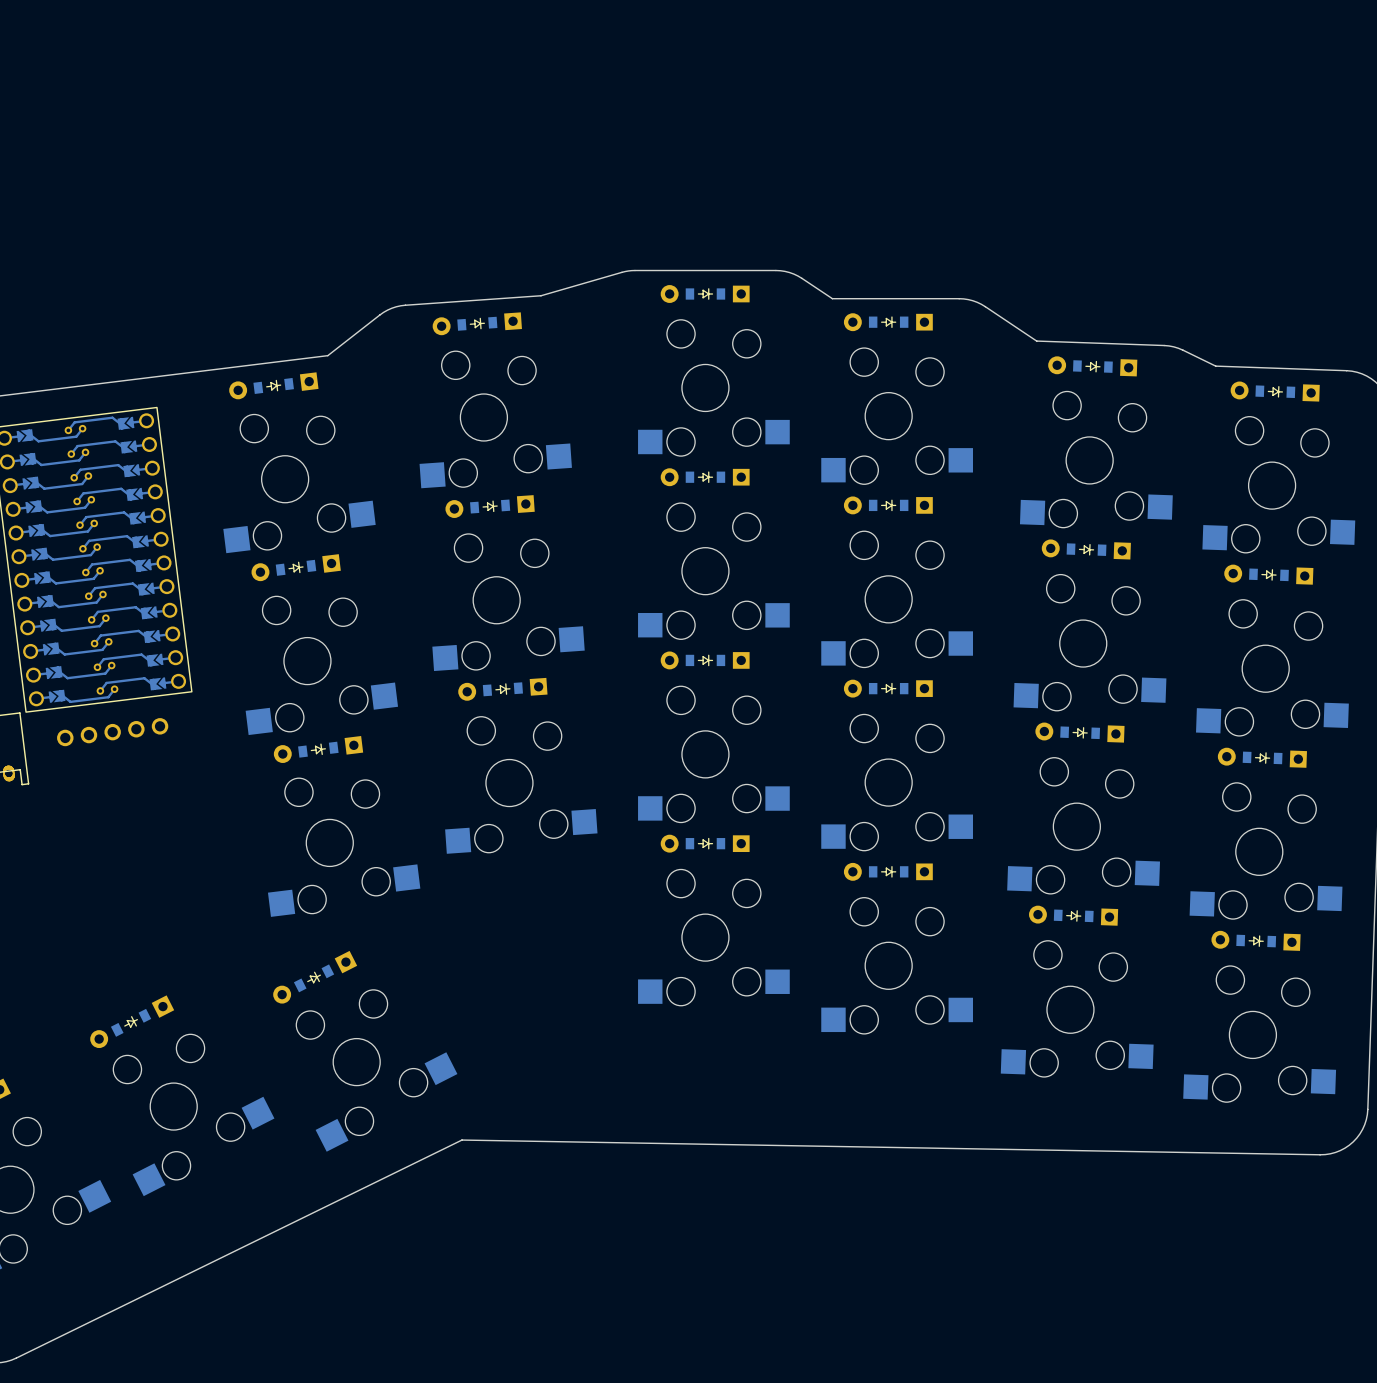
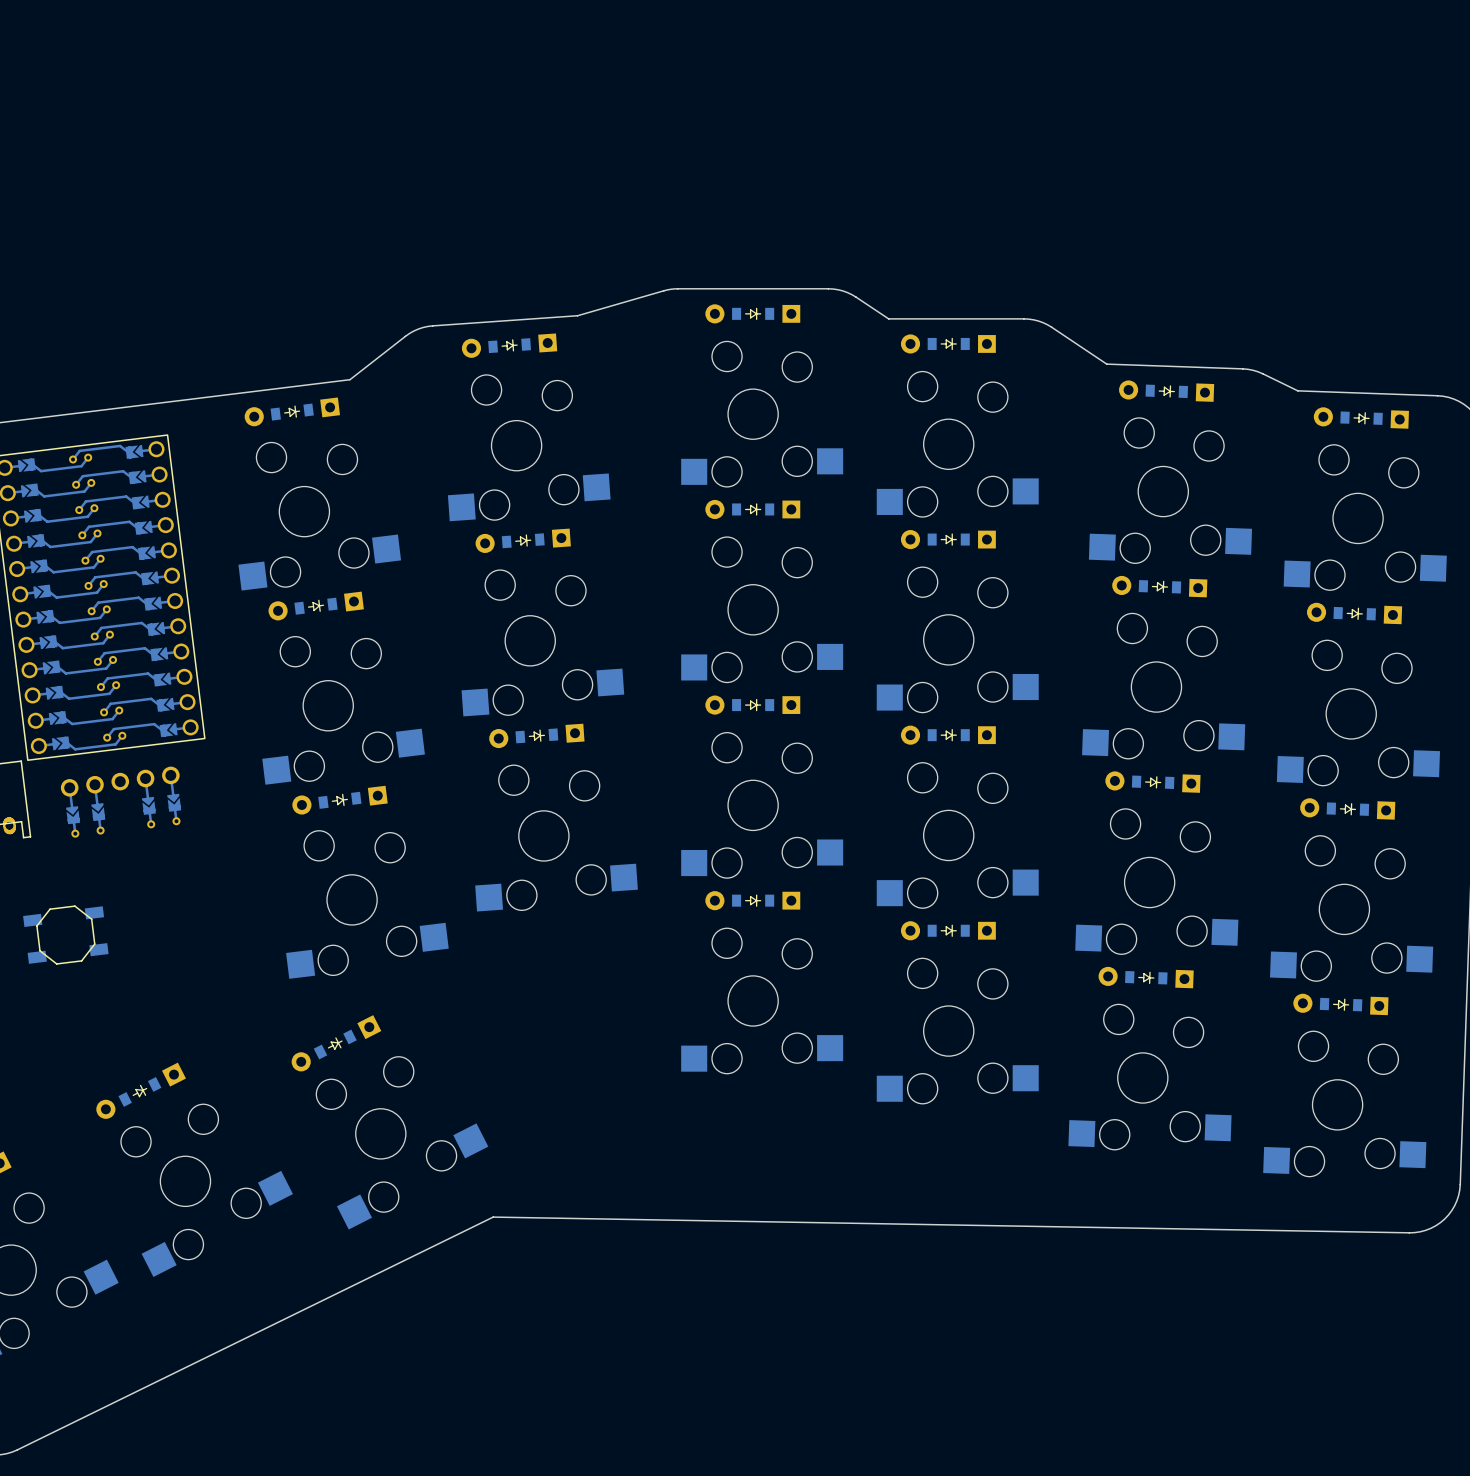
part: (112, 732) -> none
part: none -> (121, 802)
part: none -> (65, 935)

